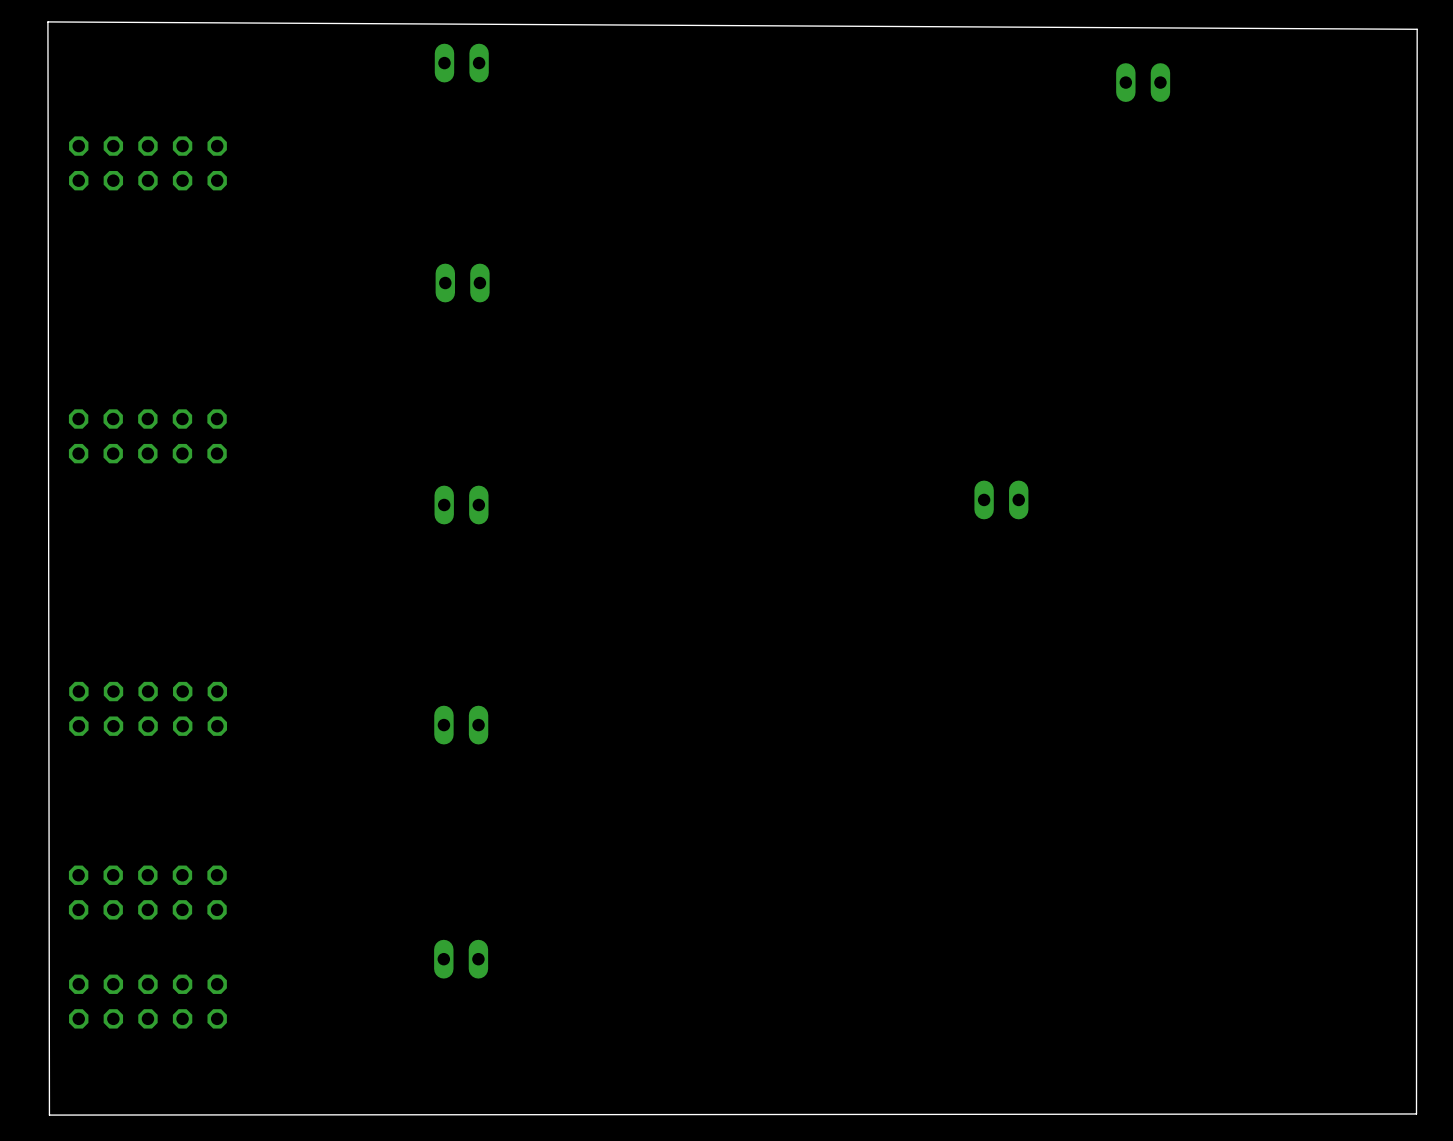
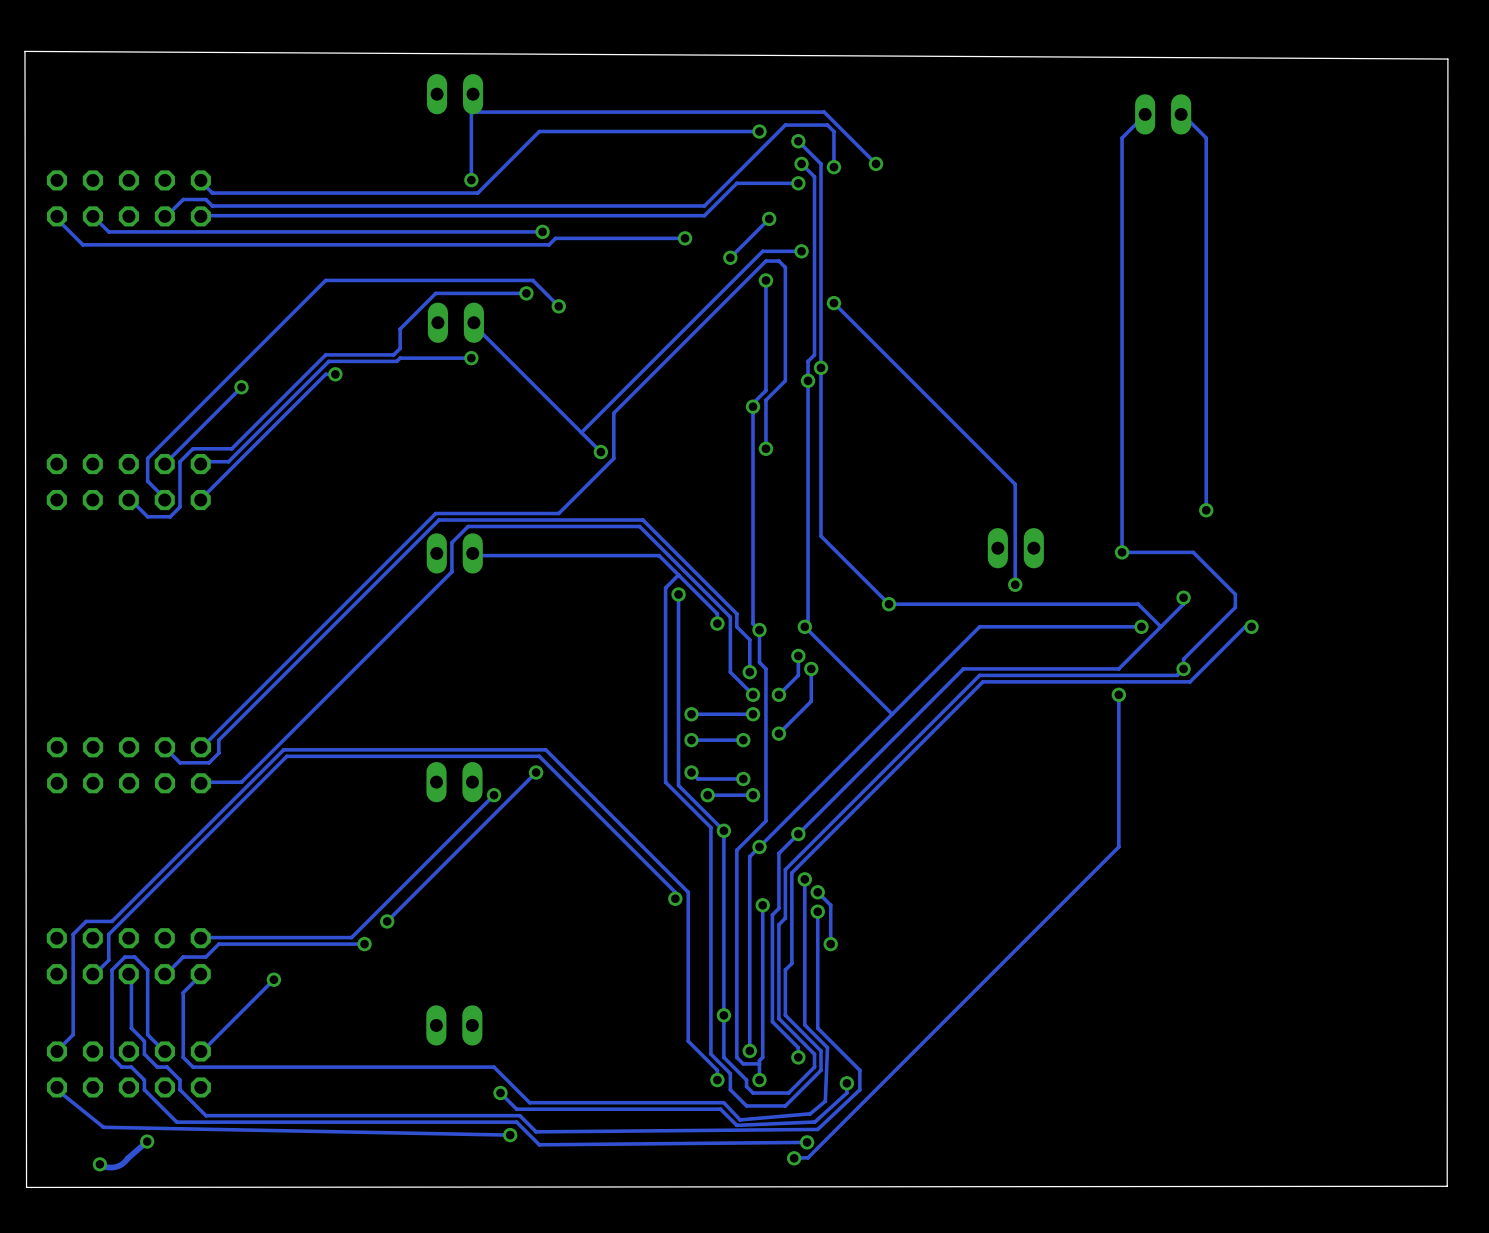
track: none -> (1145, 114) (1122, 138) (1122, 552) (1193, 552) (1235, 594) (1235, 607) (1183, 659) (1183, 668) (1177, 675) (979, 675) (785, 869) (785, 918) (778, 924) (778, 1018) (814, 1054) (814, 1067) (788, 1093) (753, 1093) (746, 1086) (746, 1080) (723, 1057) (723, 830) (678, 785) (678, 594)
track: none -> (1181, 114) (1206, 138) (1206, 510)
track: none -> (759, 131) (539, 131) (477, 193) (212, 193) (200, 180)
via: none -> (759, 131)
track: none -> (798, 141) (820, 163) (820, 536) (888, 604) (1138, 604) (1160, 626)
via: none -> (798, 141)
track: none -> (801, 163) (814, 176) (814, 354) (808, 361) (808, 630)
via: none -> (801, 163)
track: none -> (876, 163) (824, 112) (471, 112) (473, 94) (471, 95) (471, 180)
via: none -> (876, 163)
track: none -> (833, 167) (833, 131) (827, 125) (785, 125) (704, 205) (212, 205) (205, 199) (183, 199) (164, 216)
via: none -> (833, 167)
via: none -> (471, 180)
track: none -> (798, 183) (736, 183) (704, 215) (200, 216)
via: none -> (798, 183)
track: none -> (56, 216) (56, 218) (82, 244) (549, 244) (555, 238) (685, 238)
track: none -> (92, 216) (108, 231) (542, 231)
track: none -> (769, 218) (730, 257)
via: none -> (769, 218)
via: none -> (542, 231)
via: none -> (685, 238)
track: none -> (801, 251) (762, 251) (581, 432)
via: none -> (801, 251)
via: none -> (730, 257)
track: none -> (765, 280) (765, 390) (753, 403) (753, 623) (759, 630) (759, 662) (765, 668) (765, 821) (736, 850) (736, 1057) (743, 1063) (759, 1063)
via: none -> (765, 280)
track: none -> (526, 293) (435, 293) (400, 329) (400, 348) (393, 354) (325, 354) (231, 448) (192, 448) (180, 461) (180, 507) (170, 516) (147, 516) (128, 500)
via: none -> (526, 293)
track: none -> (833, 303) (1015, 484) (1015, 584)
via: none -> (833, 303)
track: none -> (558, 306) (532, 280) (325, 280) (147, 458) (147, 481) (164, 500)
via: none -> (558, 306)
track: none -> (473, 322) (474, 325) (600, 452)
track: none -> (471, 358) (400, 358) (396, 361) (328, 361) (228, 461) (202, 461) (200, 464)
via: none -> (471, 358)
via: none -> (820, 367)
track: none -> (335, 374) (325, 374) (200, 500)
via: none -> (335, 374)
via: none -> (808, 380)
track: none -> (241, 387) (164, 464)
via: none -> (241, 387)
via: none -> (753, 406)
track: none -> (765, 448) (765, 400) (785, 380) (785, 267) (778, 261) (765, 261) (613, 413) (613, 458) (558, 513) (435, 513) (201, 747)
via: none -> (765, 448)
via: none -> (600, 452)
via: none -> (1206, 510)
via: none -> (1122, 552)
track: none -> (472, 553) (474, 555) (659, 555) (717, 613) (717, 623)
track: none -> (678, 575) (665, 587) (665, 782) (710, 827) (710, 1054) (730, 1073) (730, 1089) (746, 1105) (785, 1105) (820, 1070) (820, 1050) (785, 1015) (785, 969) (791, 963) (791, 872) (982, 681) (1190, 681) (1245, 626) (1251, 626)
via: none -> (1015, 584)
via: none -> (678, 594)
track: none -> (1183, 597) (1183, 604) (1118, 668) (963, 668) (778, 853) (778, 908) (772, 914) (772, 1021) (798, 1047) (798, 1057)
via: none -> (1183, 597)
via: none -> (888, 604)
via: none -> (717, 623)
track: none -> (804, 626) (892, 714)
via: none -> (804, 626)
track: none -> (1141, 626) (979, 626) (749, 856) (749, 1050)
via: none -> (1141, 626)
via: none -> (1251, 626)
via: none -> (759, 630)
track: none -> (798, 655) (798, 675) (778, 694)
via: none -> (798, 655)
track: none -> (811, 668) (811, 701) (778, 733)
via: none -> (811, 668)
via: none -> (1183, 668)
track: none -> (749, 672) (749, 639) (736, 626) (736, 613) (642, 520) (438, 520) (218, 740) (218, 753) (209, 762) (180, 762) (165, 747)
via: none -> (749, 672)
track: none -> (753, 694) (730, 672) (730, 617) (639, 526) (468, 526) (451, 542) (451, 571) (241, 782) (201, 783)
via: none -> (753, 694)
via: none -> (778, 694)
track: none -> (1118, 694) (1118, 846) (808, 1157) (794, 1158)
via: none -> (1118, 694)
via: none -> (691, 714)
track: none -> (753, 714) (691, 714)
via: none -> (753, 714)
via: none -> (778, 733)
via: none -> (691, 740)
track: none -> (743, 740) (691, 740)
via: none -> (743, 740)
track: none -> (536, 772) (387, 921)
via: none -> (536, 772)
track: none -> (691, 772) (697, 778) (743, 778)
via: none -> (691, 772)
via: none -> (743, 778)
track: none -> (494, 795) (351, 937) (200, 938)
via: none -> (494, 795)
via: none -> (707, 795)
track: none -> (753, 795) (707, 795)
via: none -> (753, 795)
via: none -> (723, 830)
via: none -> (798, 834)
via: none -> (759, 846)
track: none -> (804, 879) (804, 1025) (827, 1047) (825, 1101) (810, 1113) (740, 1119) (723, 1102) (529, 1102) (494, 1067) (192, 1067) (183, 1057) (183, 992) (200, 974)
via: none -> (804, 879)
track: none -> (817, 892) (830, 905) (830, 944)
via: none -> (817, 892)
track: none -> (675, 898) (675, 892) (539, 756) (286, 756) (108, 934) (108, 960) (92, 974)
via: none -> (675, 898)
track: none -> (762, 905) (762, 1057) (759, 1060) (759, 1080)
via: none -> (762, 905)
track: none -> (817, 911) (817, 1028) (859, 1070) (859, 1089) (817, 1129) (536, 1131) (519, 1115) (205, 1115) (180, 1089) (180, 1080) (167, 1067) (157, 1067) (144, 1054) (144, 1041) (131, 1028) (131, 976) (128, 974)
via: none -> (817, 911)
via: none -> (387, 921)
track: none -> (364, 944) (218, 944) (205, 957) (183, 957) (164, 974)
via: none -> (364, 944)
via: none -> (830, 944)
track: none -> (273, 979) (200, 1051)
via: none -> (273, 979)
via: none -> (723, 1015)
via: none -> (749, 1050)
track: none -> (56, 1051) (73, 1034) (73, 934) (86, 921) (112, 921) (283, 749) (545, 749) (688, 892) (688, 1041) (717, 1070) (717, 1080)
track: none -> (164, 1051) (147, 1034) (147, 969) (134, 957) (124, 957) (112, 969) (112, 1057) (121, 1067) (131, 1067) (144, 1080) (144, 1089) (176, 1122) (516, 1122) (539, 1144) (807, 1142)
via: none -> (798, 1057)
via: none -> (717, 1080)
via: none -> (759, 1080)
track: none -> (846, 1083) (846, 1093) (814, 1121) (736, 1125) (720, 1109) (516, 1109) (500, 1093)
via: none -> (846, 1083)
track: none -> (56, 1087) (56, 1089) (103, 1127) (510, 1135)
via: none -> (500, 1093)
via: none -> (510, 1135)
track: none -> (147, 1141) (119, 1165) (109, 1167) (99, 1164)
via: none -> (147, 1141)
via: none -> (807, 1142)
via: none -> (794, 1158)
via: none -> (99, 1164)

